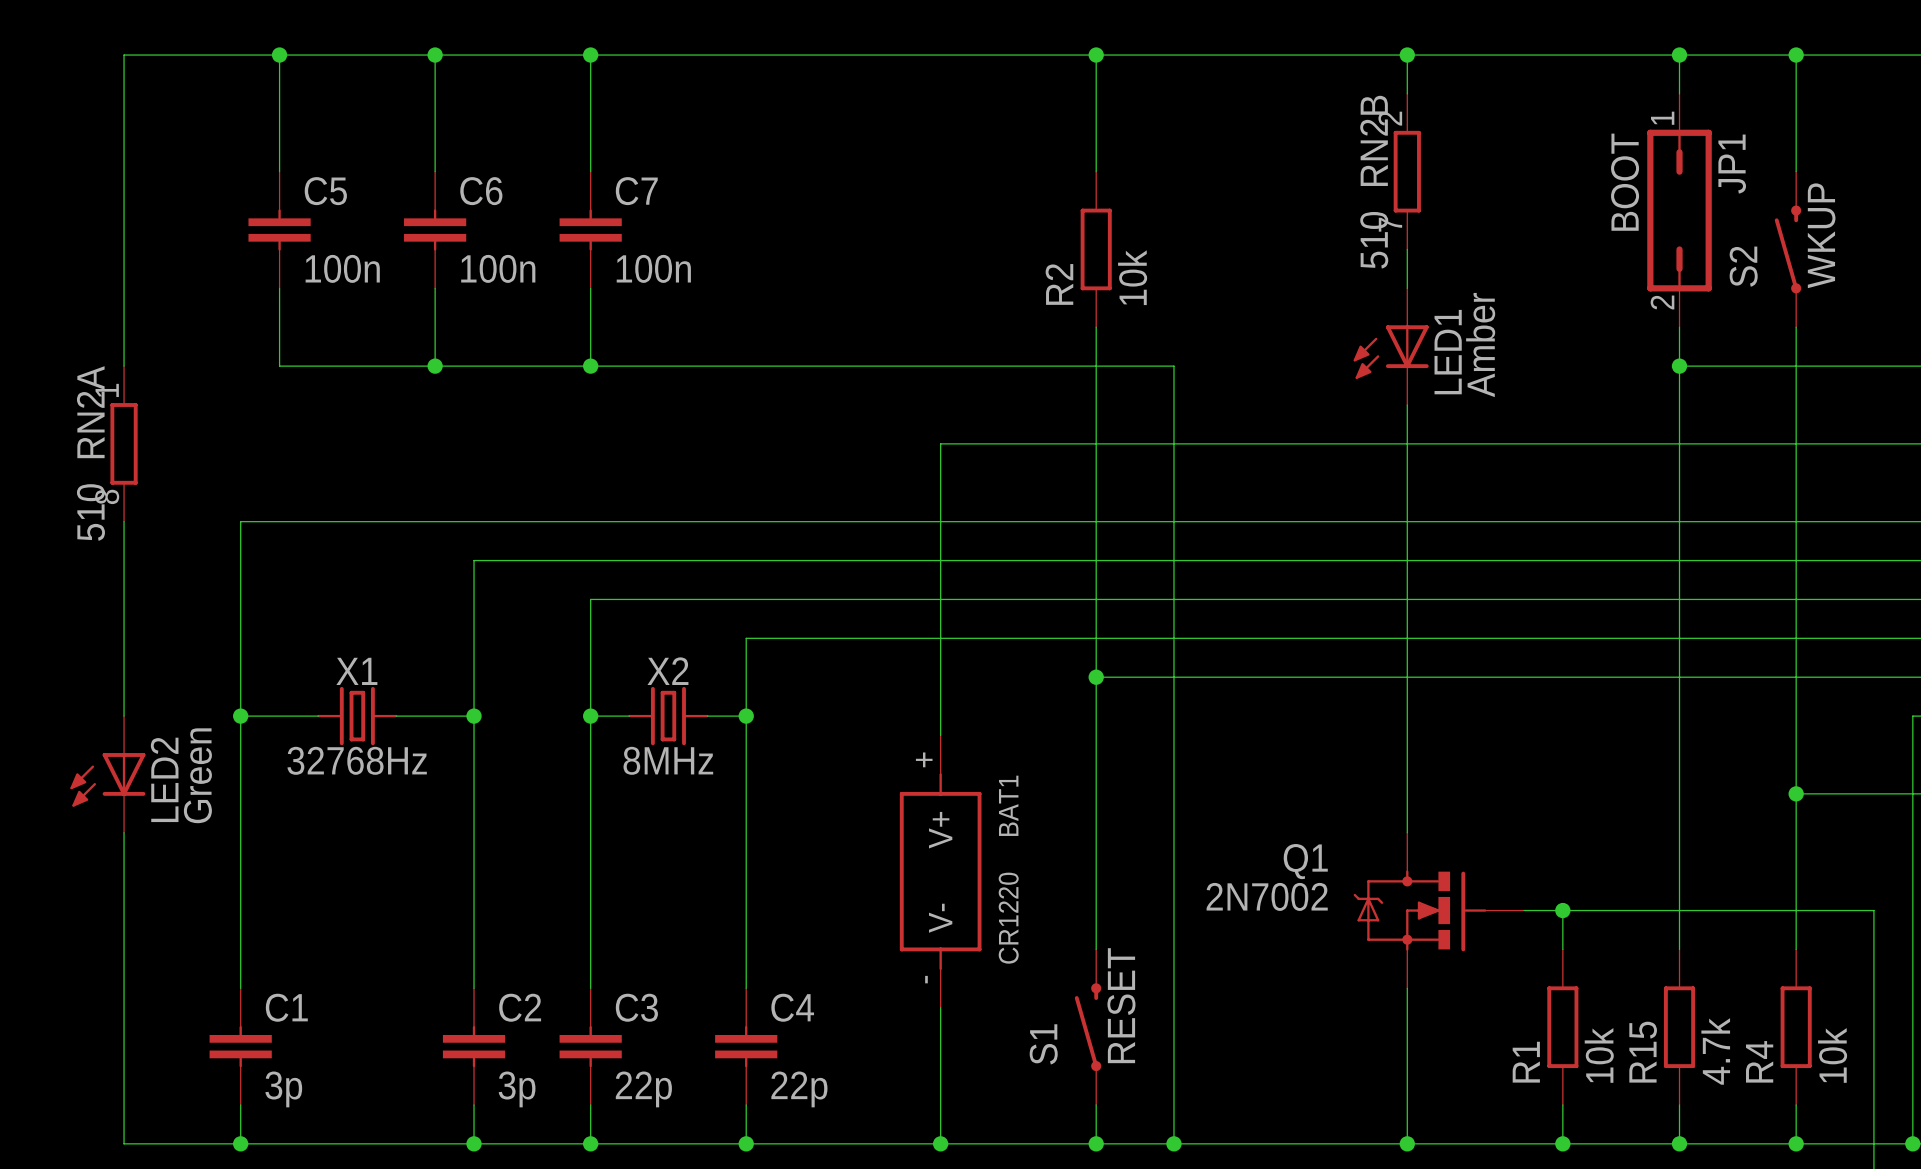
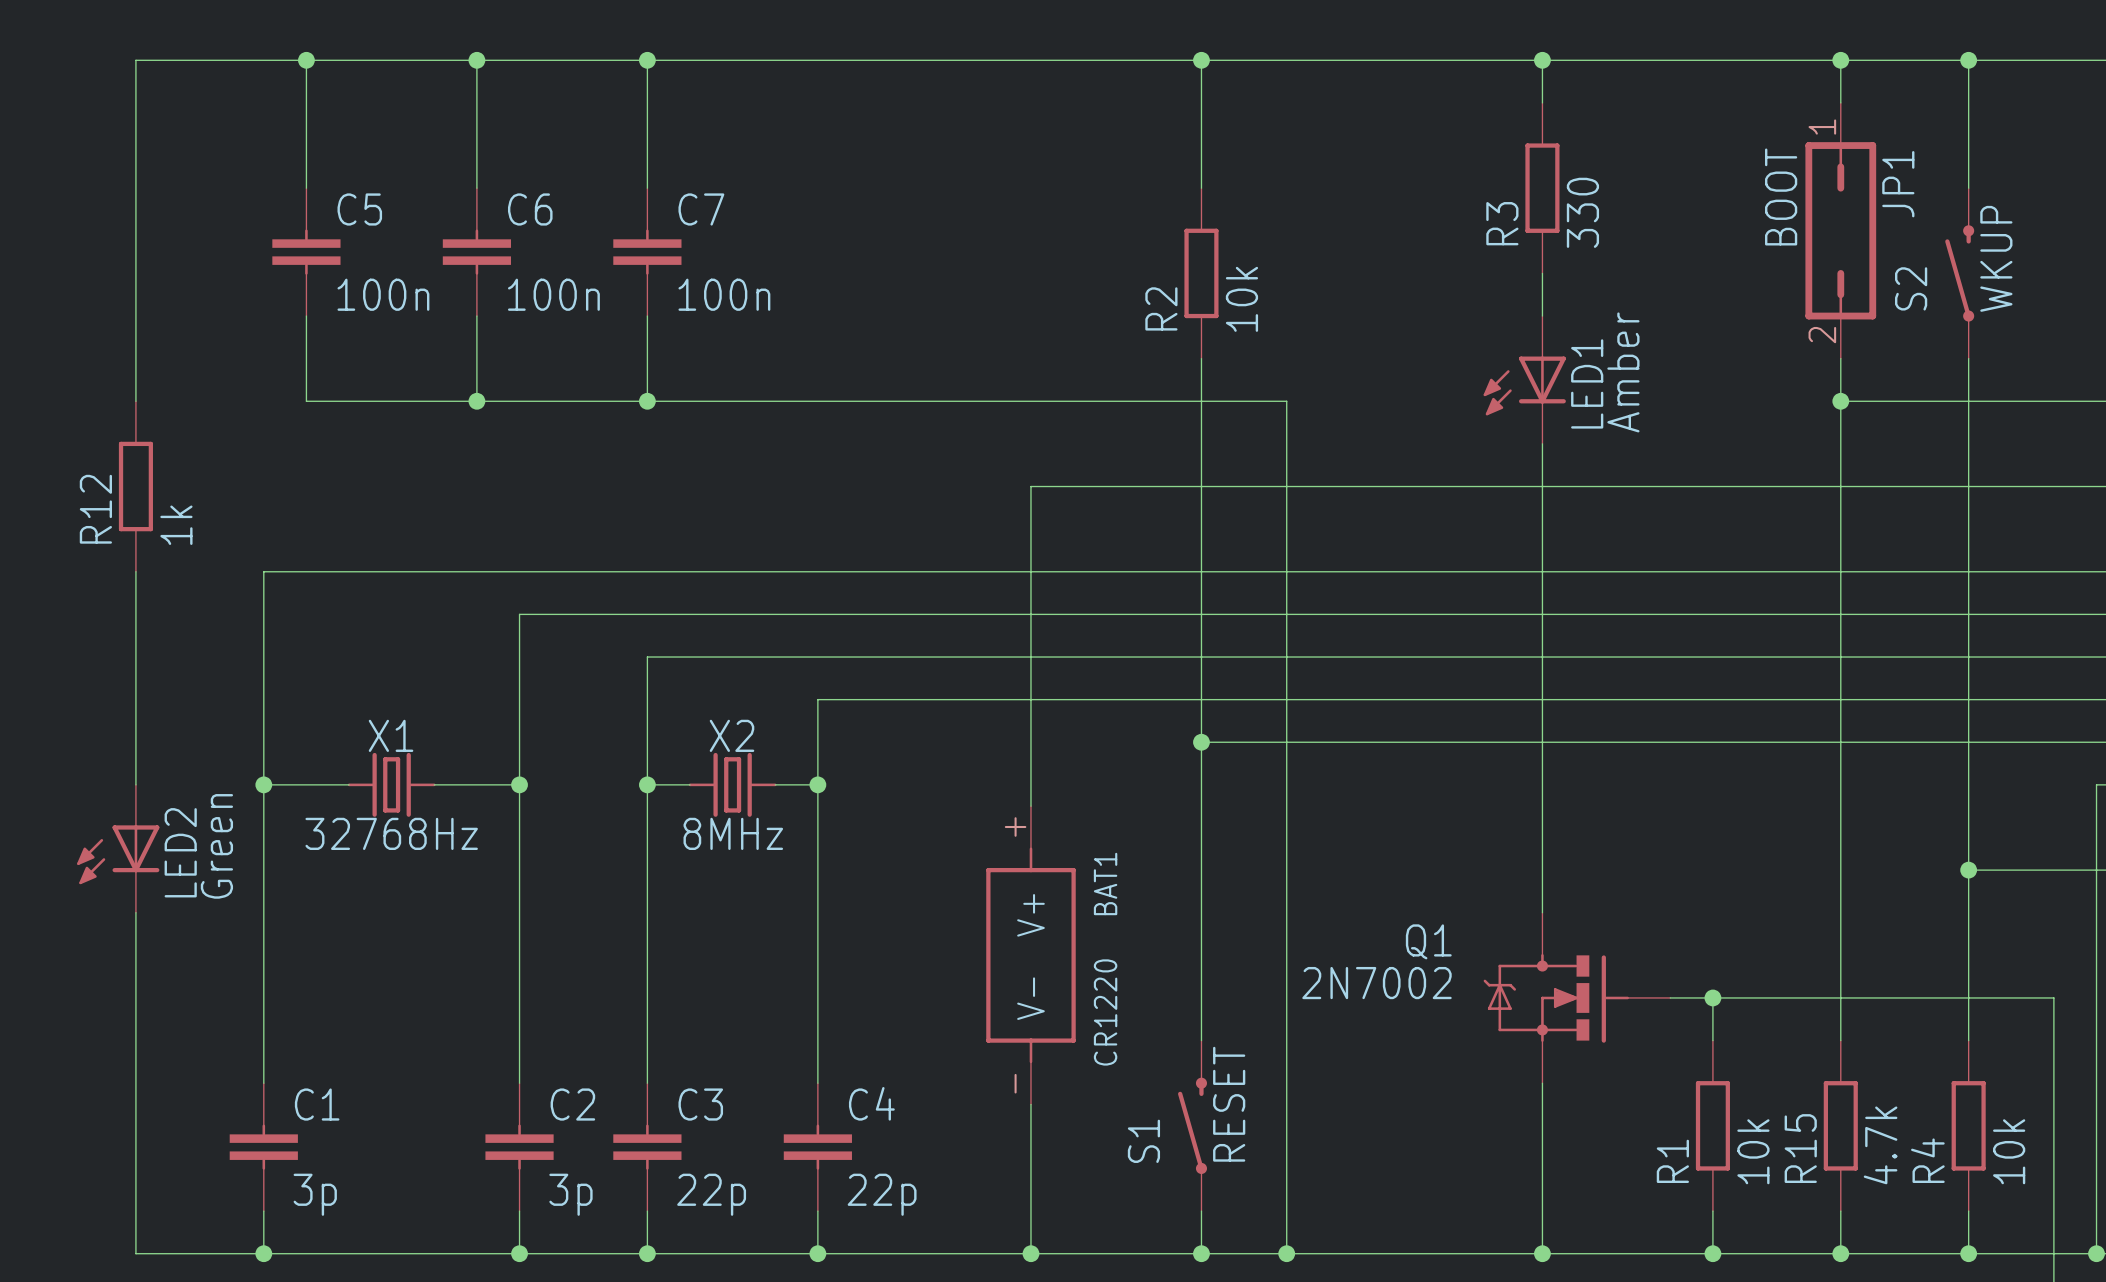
RN2B: 510 (1407, 171) -> none
R3: none -> 330 (1542, 188)
RN2A: 510 (124, 443) -> none
R12: none -> 1k (135, 486)

